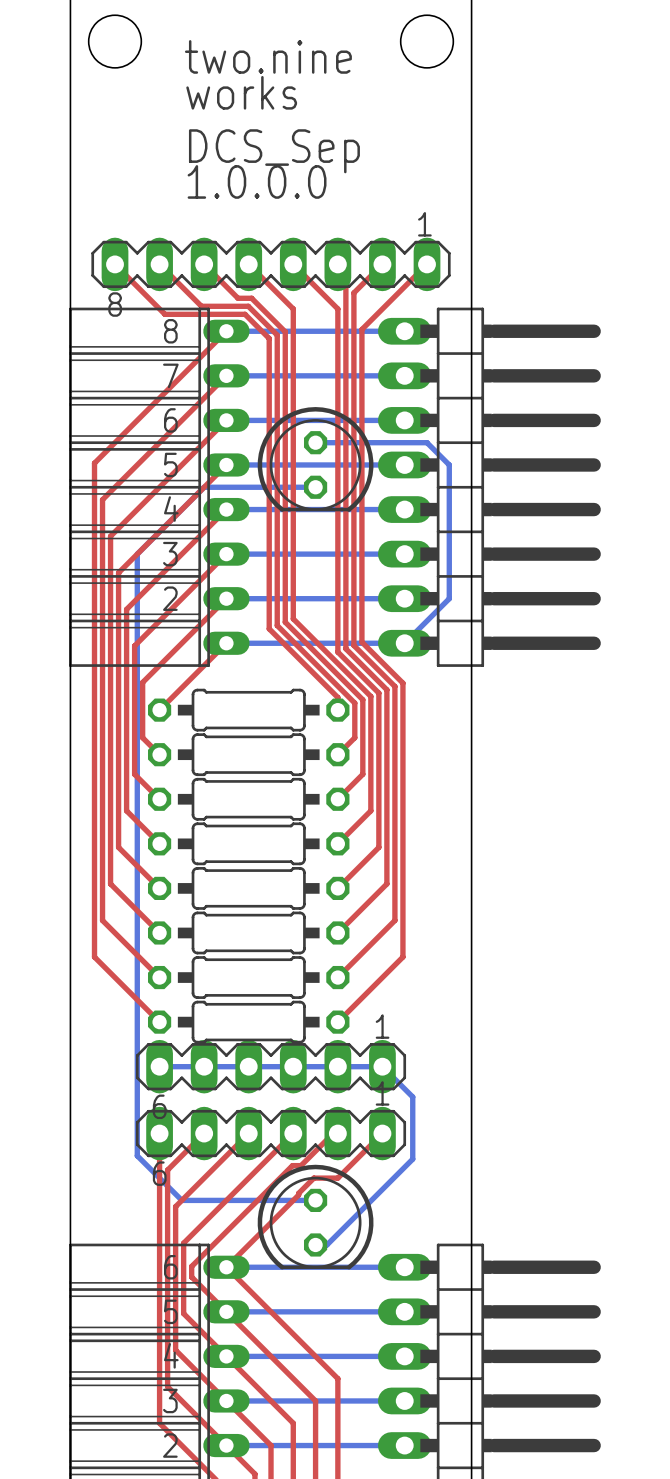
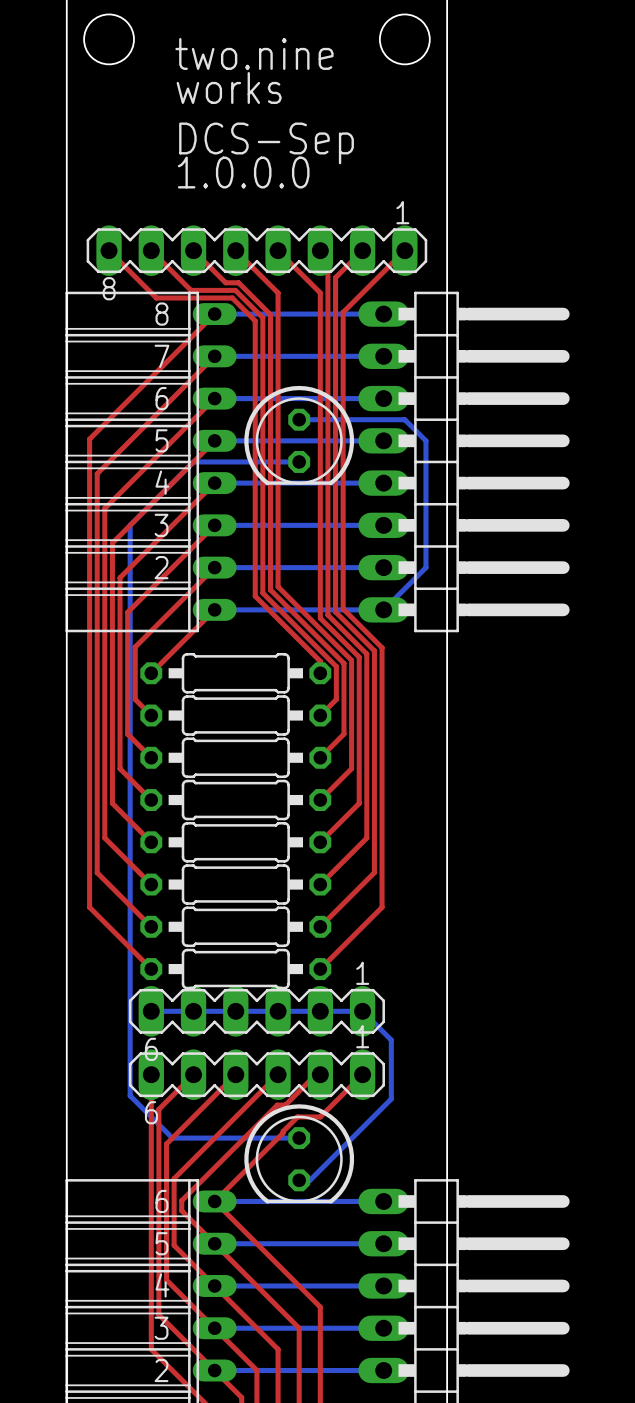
text: DCS_Sep (274, 151) -> DCS-Sep (266, 143)

